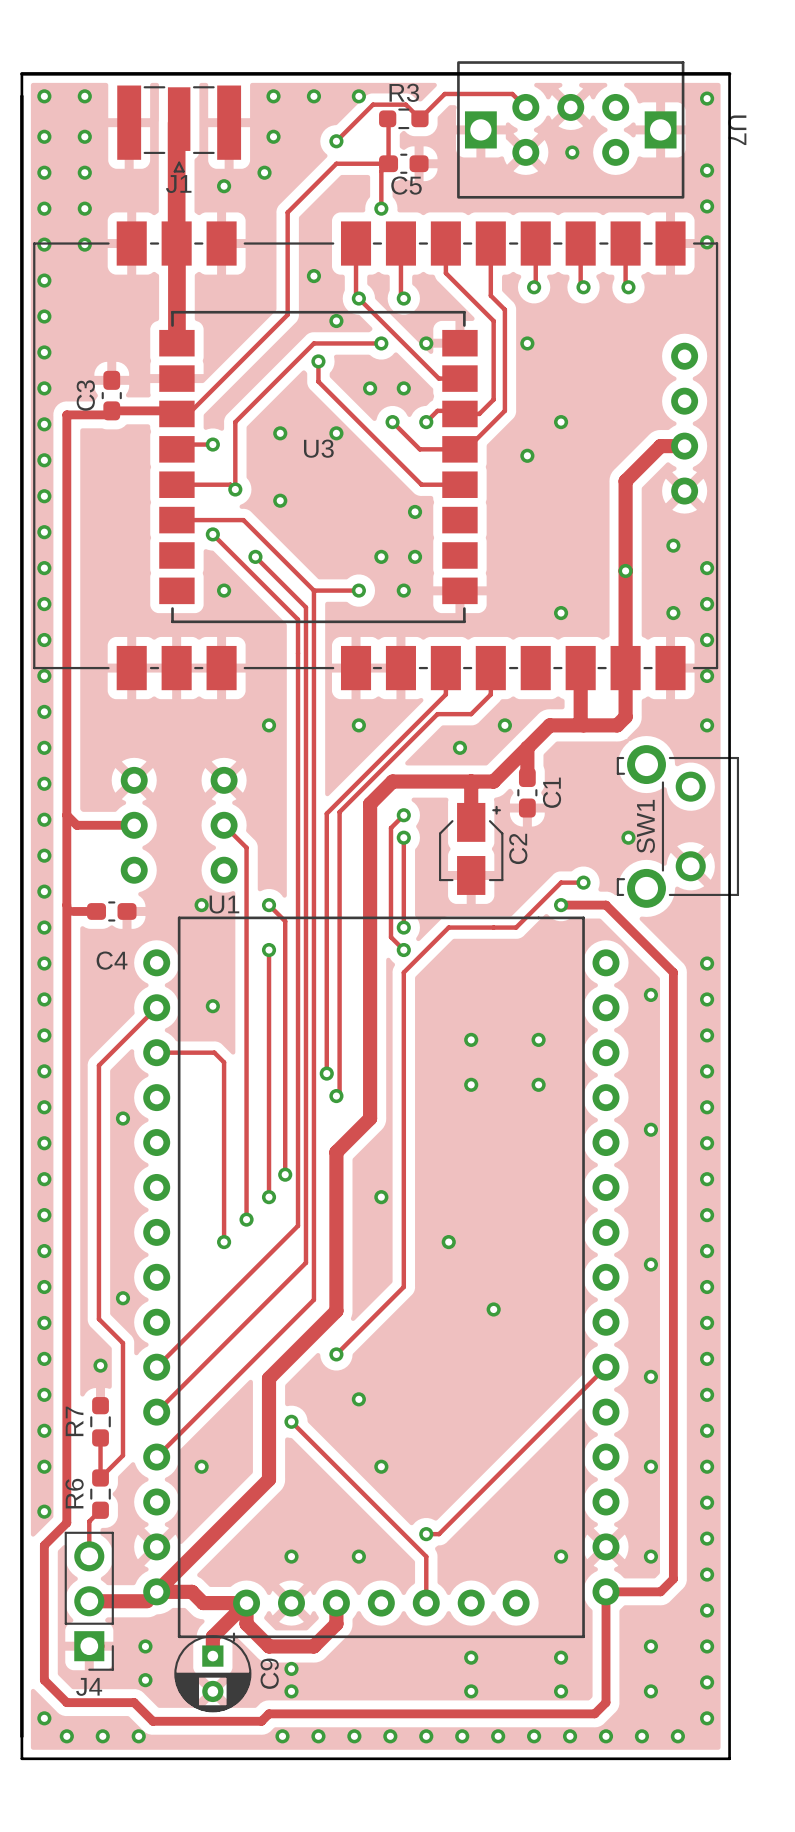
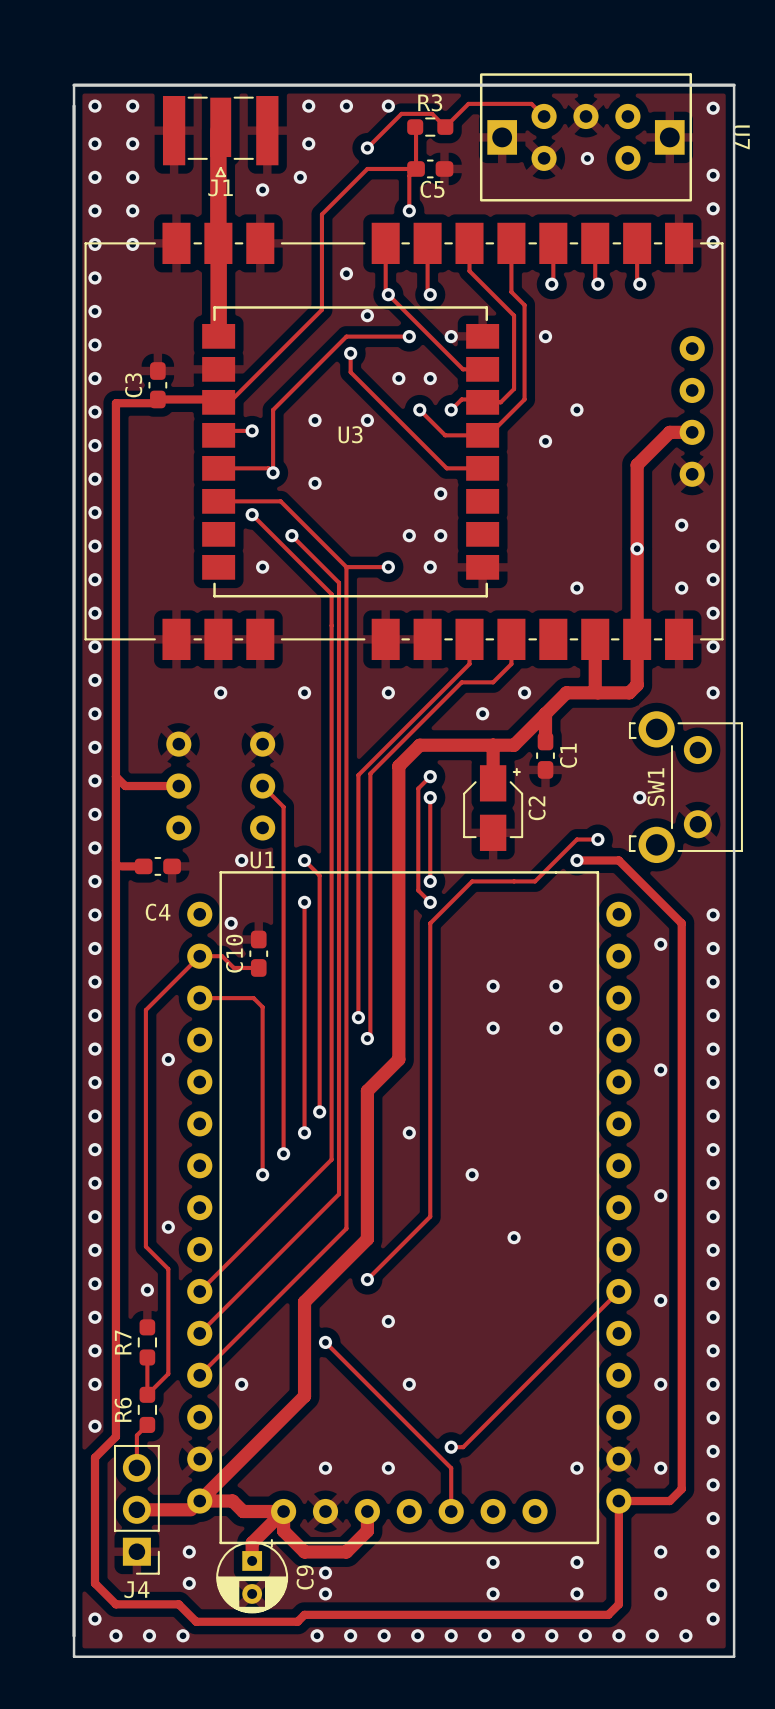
via: none -> (220, 692)
C10: none -> (258, 953)
via position: (212, 1006) -> (231, 923)
track: none -> (199, 956) (222, 956) (233, 967) (258, 967)

